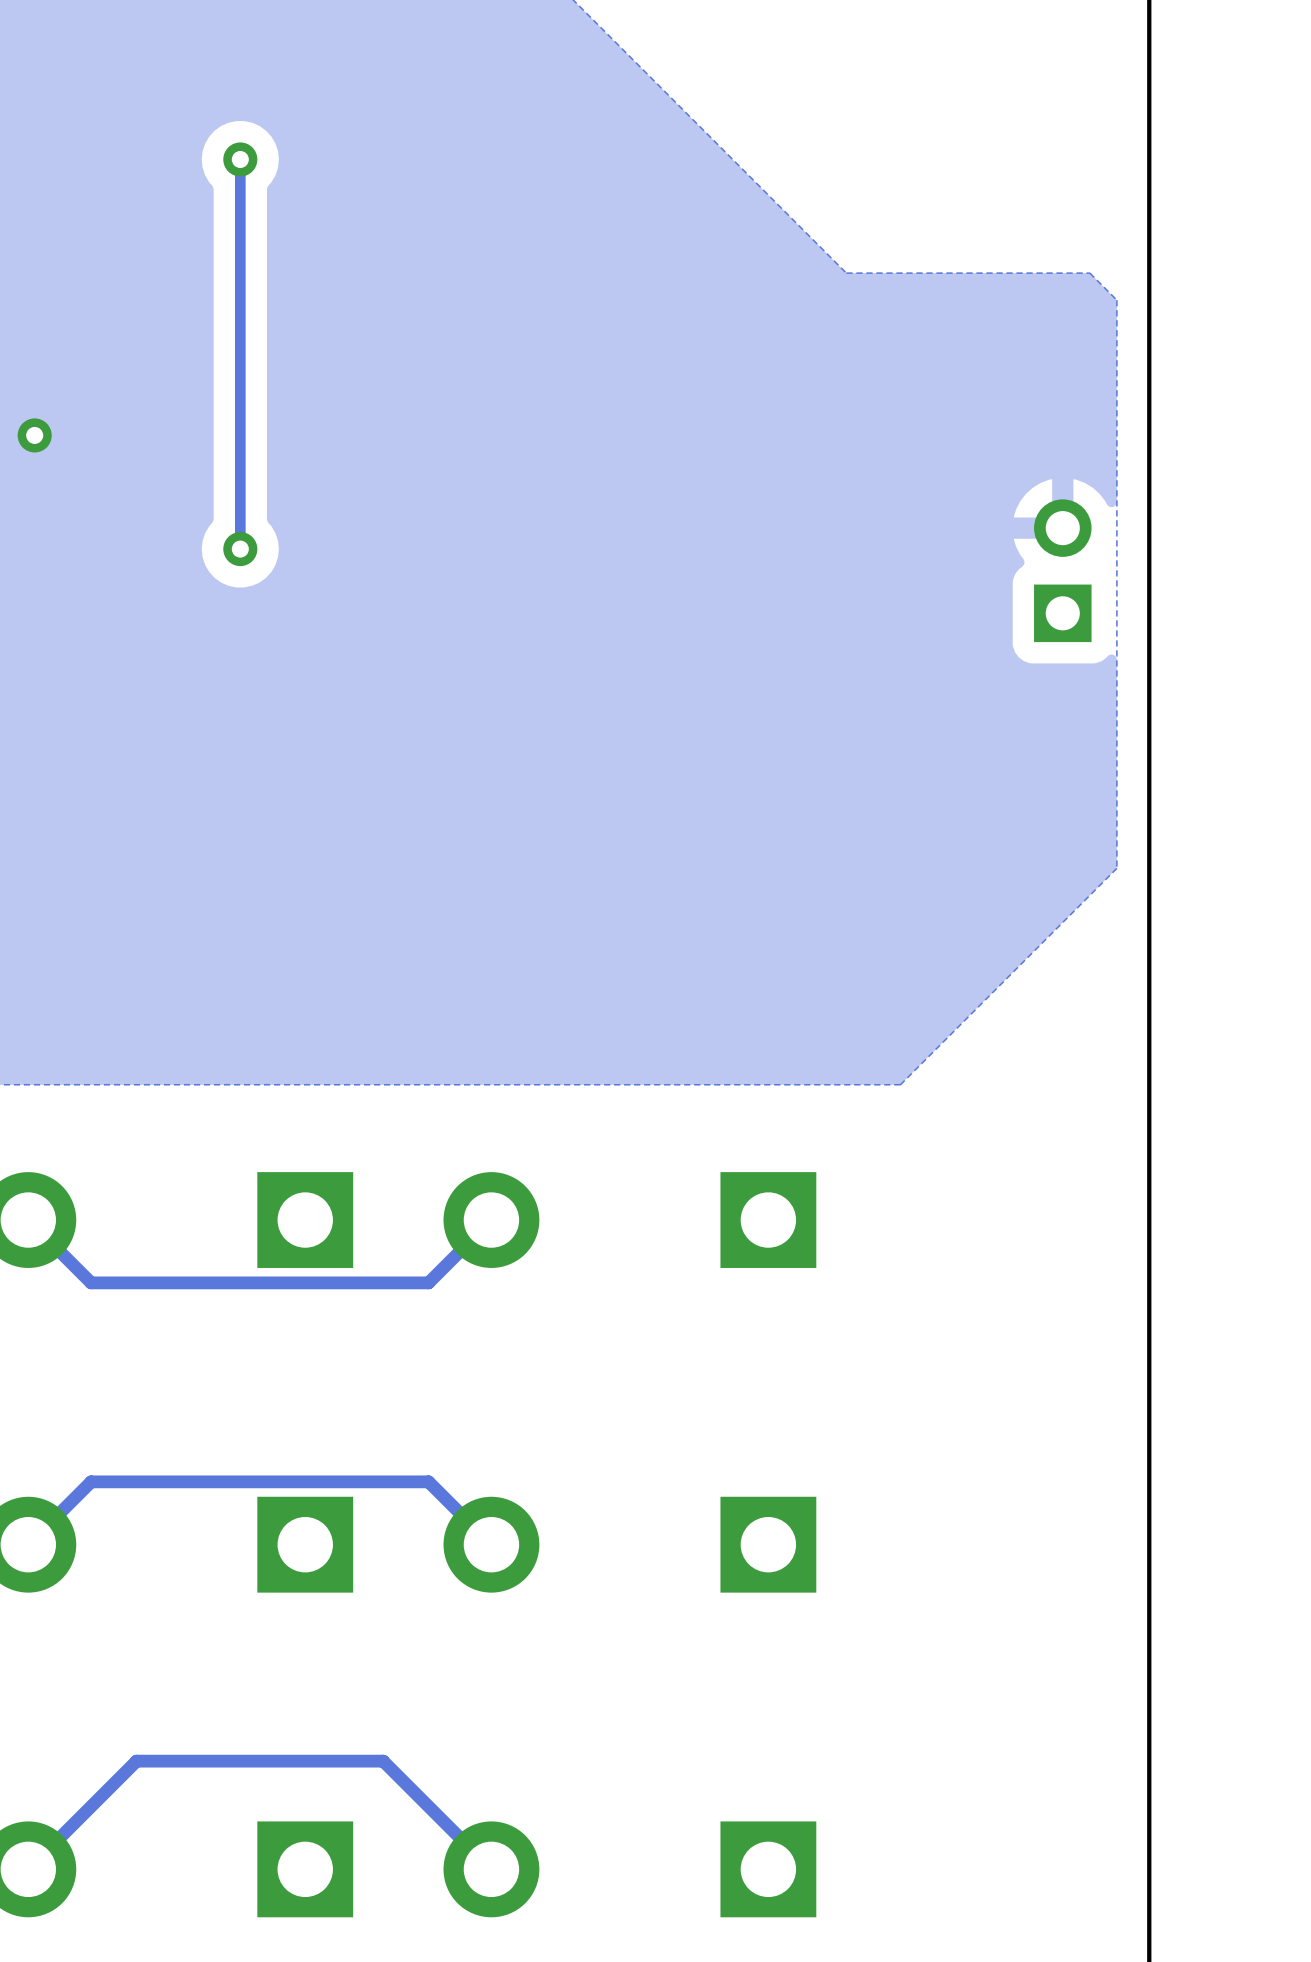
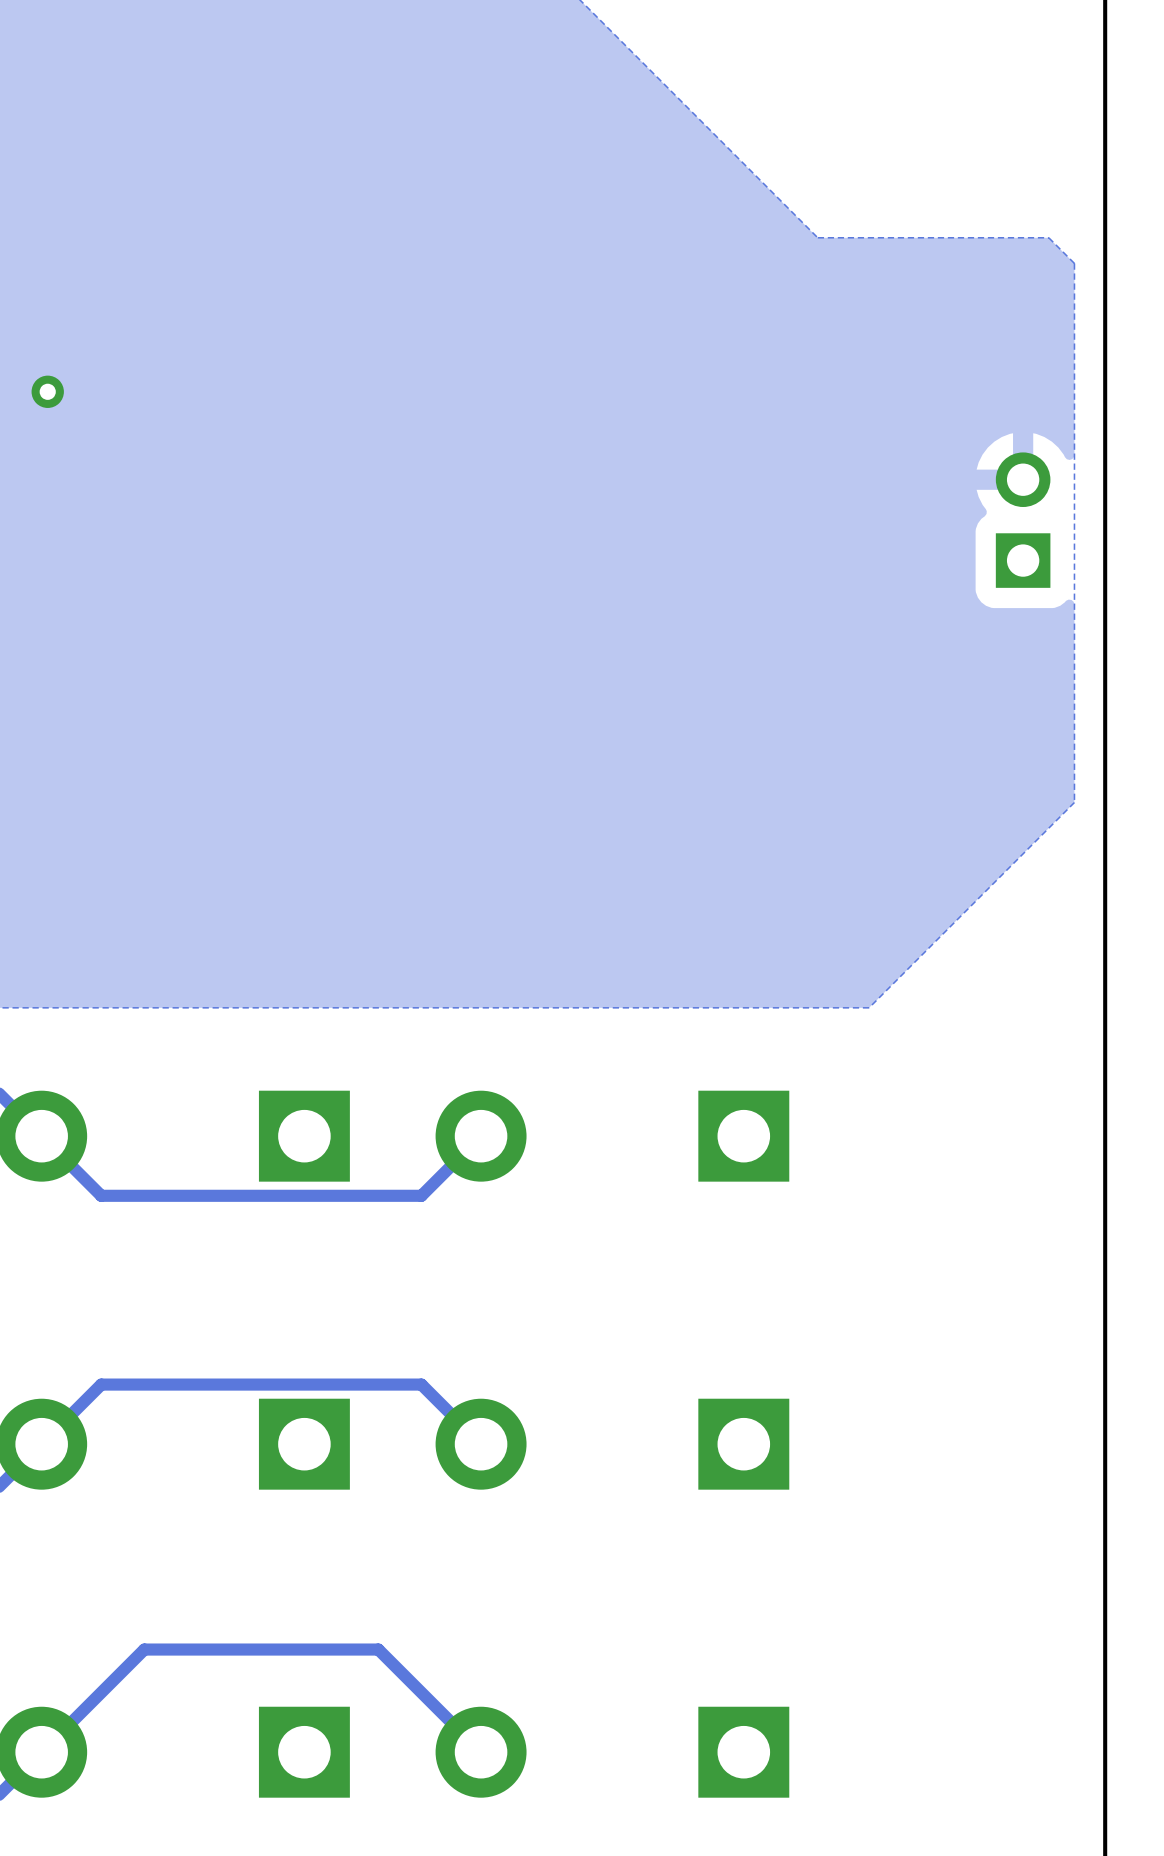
track: (240, 159) (240, 549) -> none
via: (240, 159) -> none
via: (240, 549) -> none

